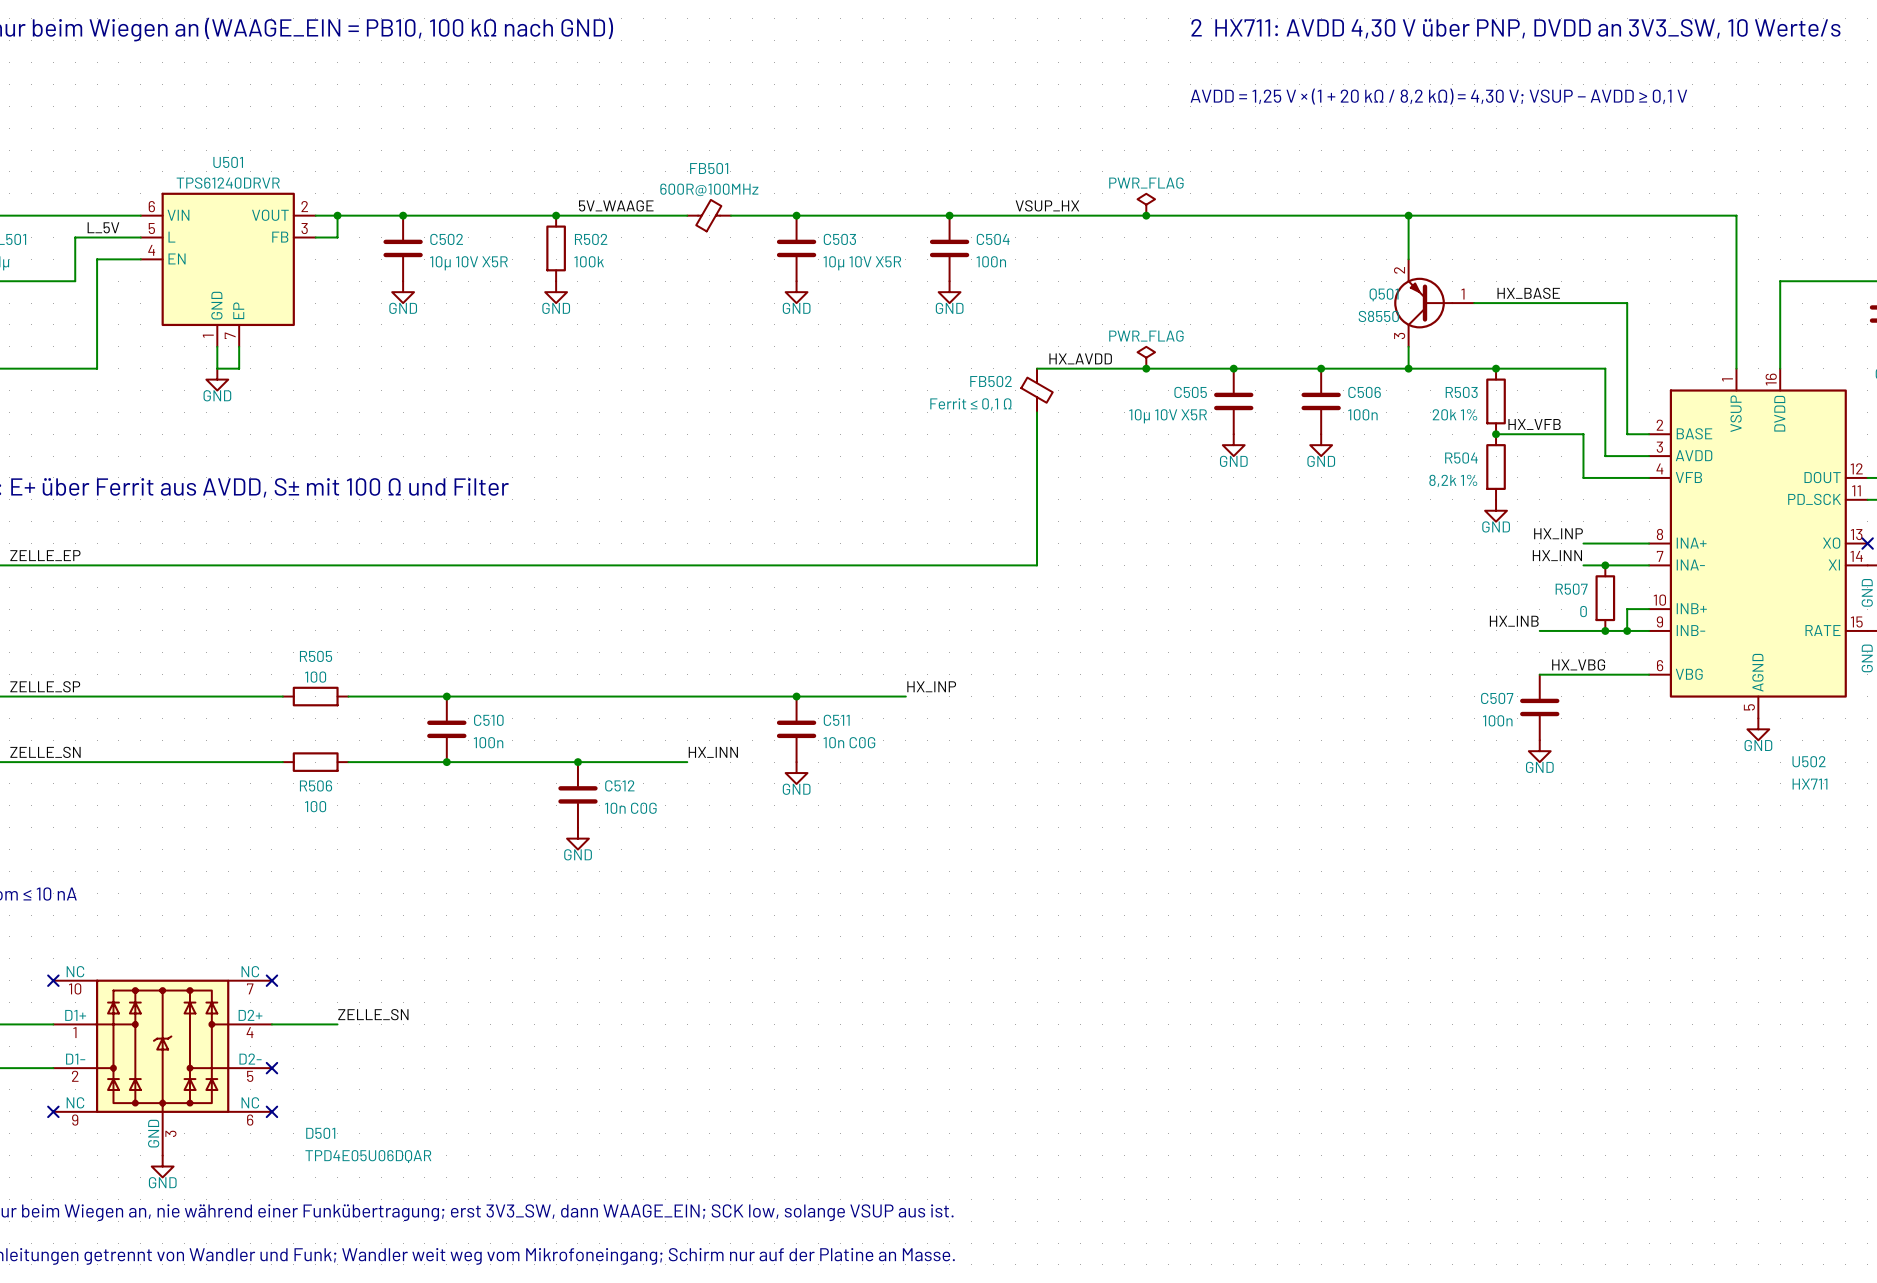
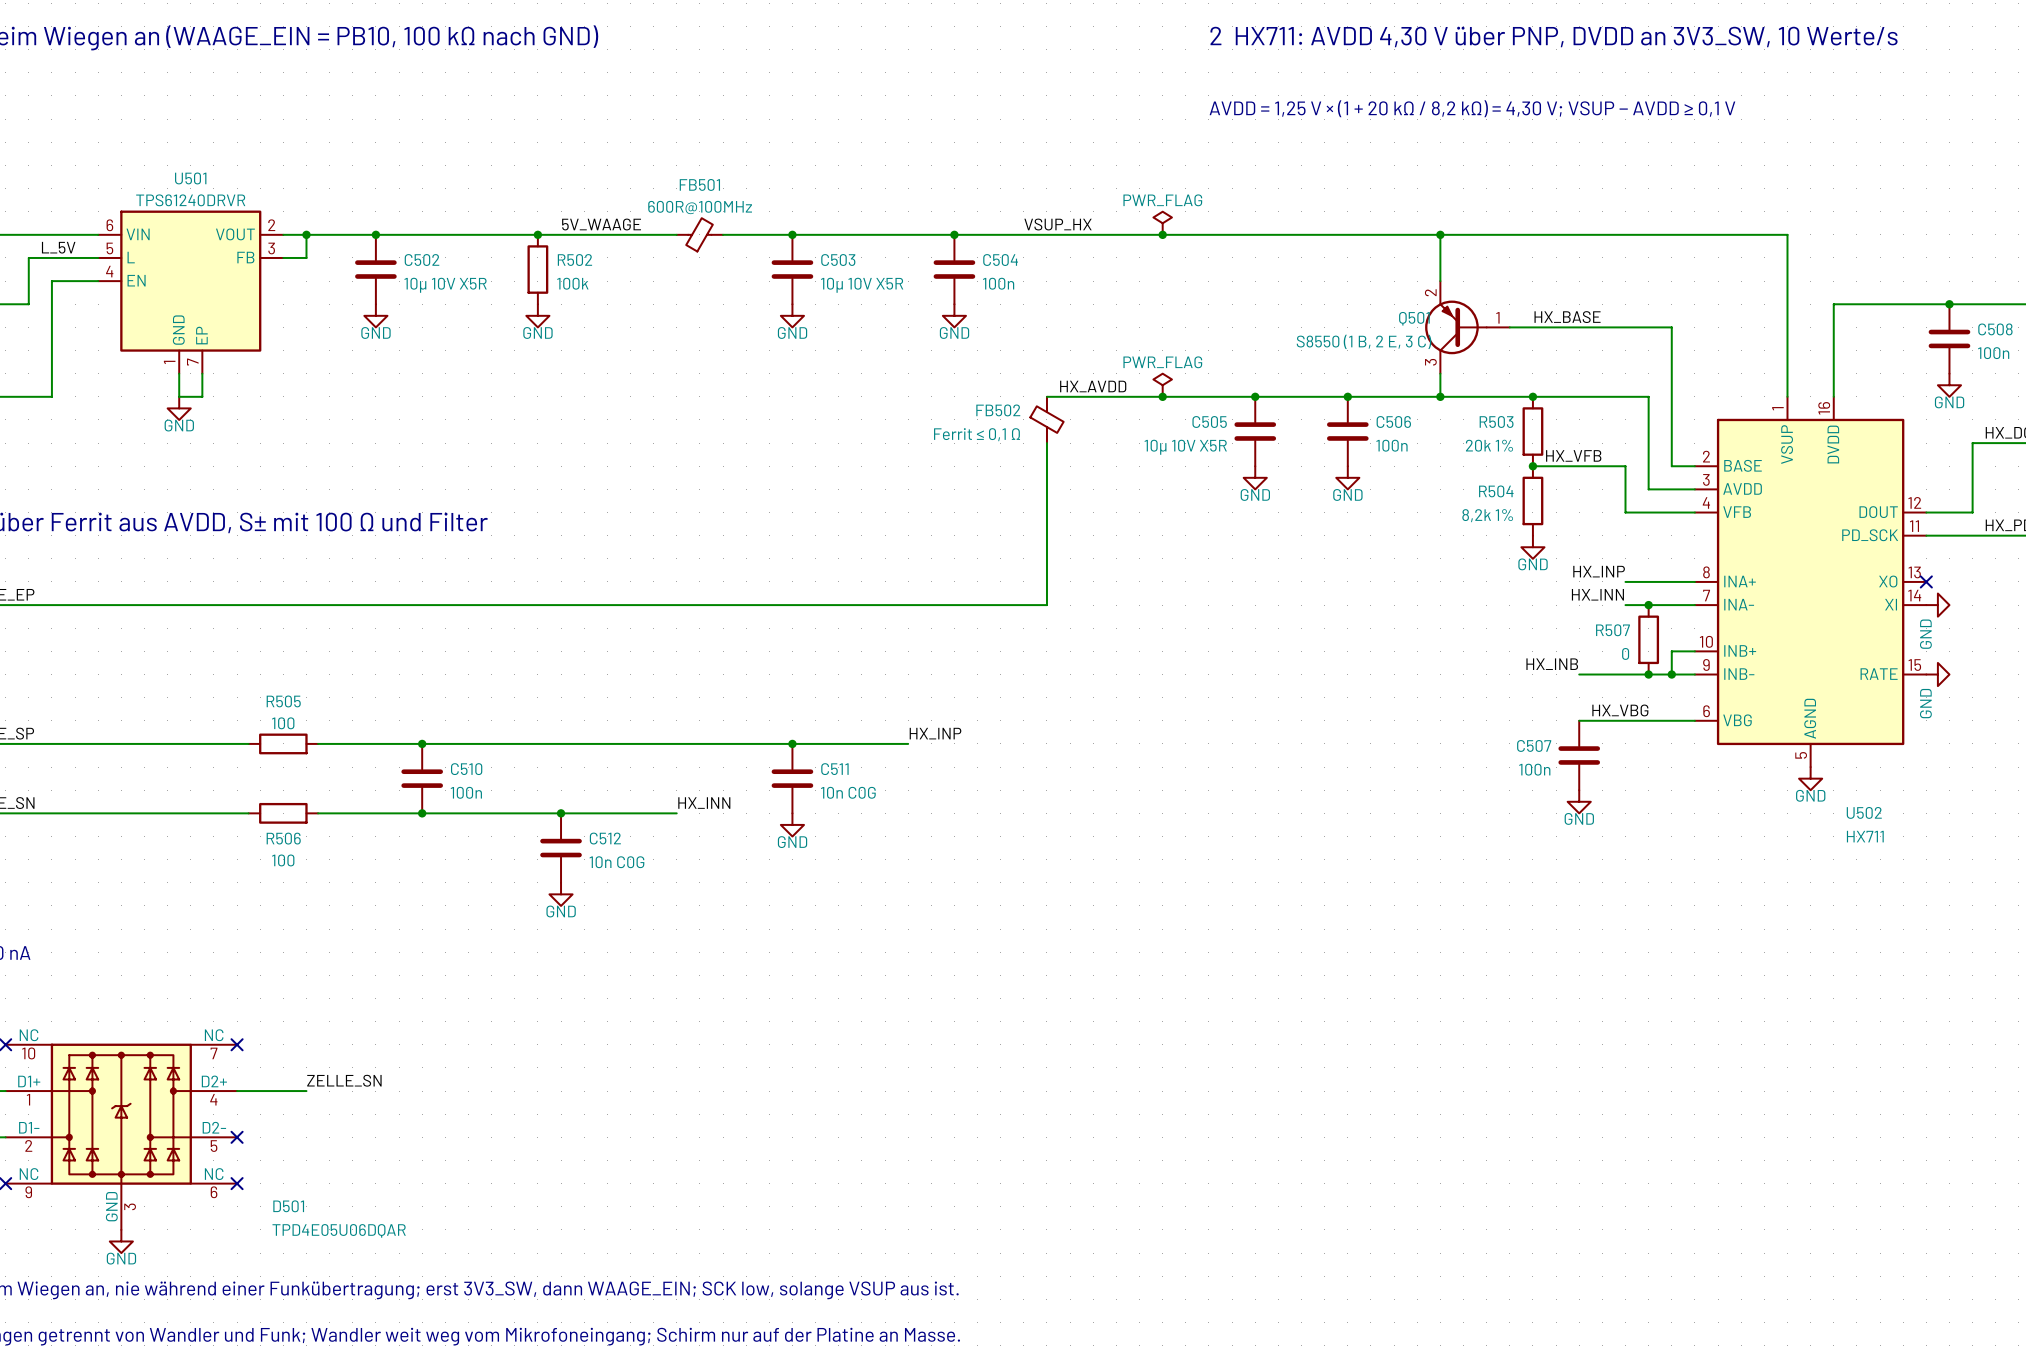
Q501 value: S8550 (1378, 316) -> S8550 (1 B, 2 E, 3 C) (1364, 341)

